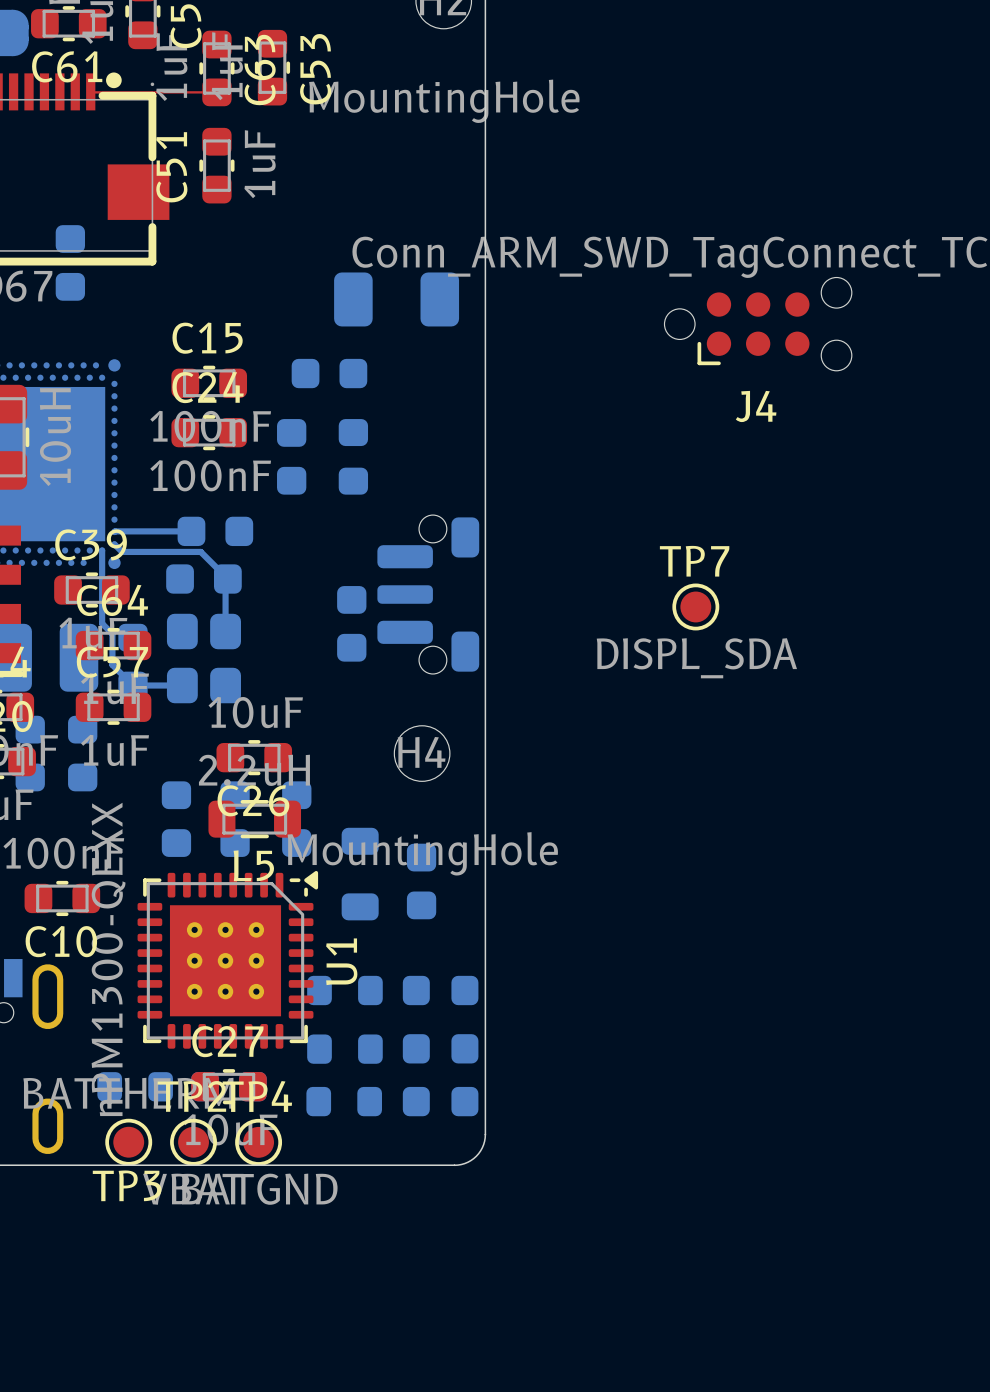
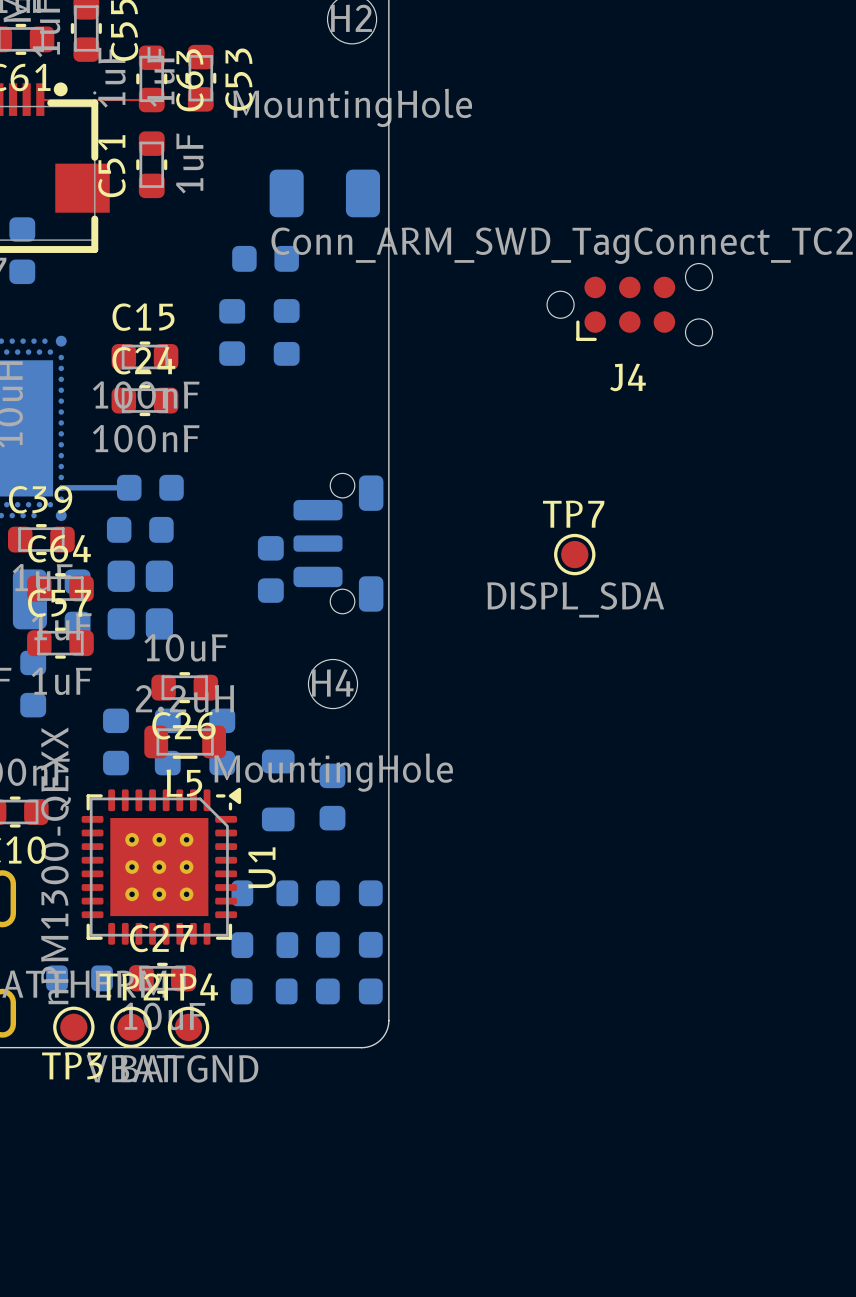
part: none -> (265, 258)
part position: (396, 299) -> (324, 193)
part rotation: 0° (329, 373) -> 90° clockwise (232, 332)
part: (291, 456) -> none
part position: (353, 456) -> (286, 332)
bottom track: (114, 544) (122, 551) (200, 551) (227, 579) (225, 581) (225, 631) -> none
bottom track: (102, 550) (102, 623) (112, 633) (112, 664) (132, 685) (182, 685) -> none

